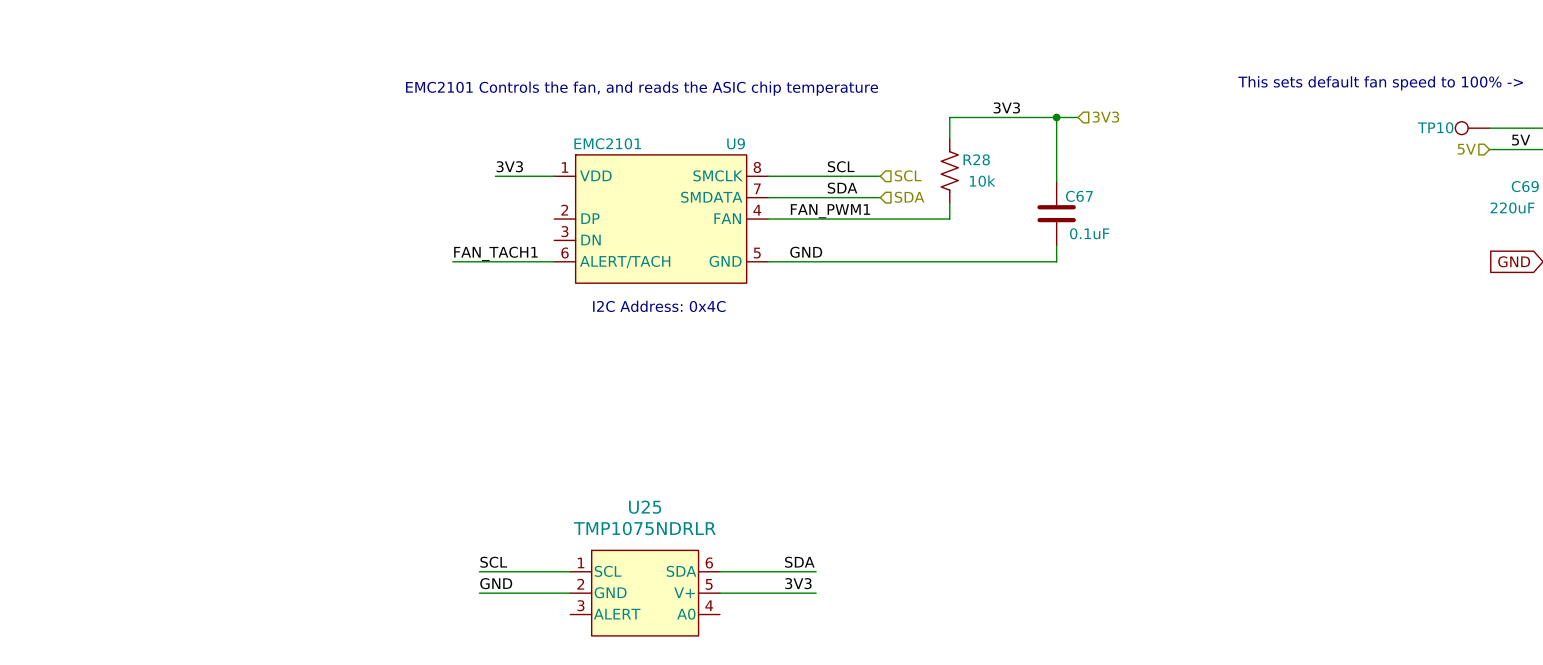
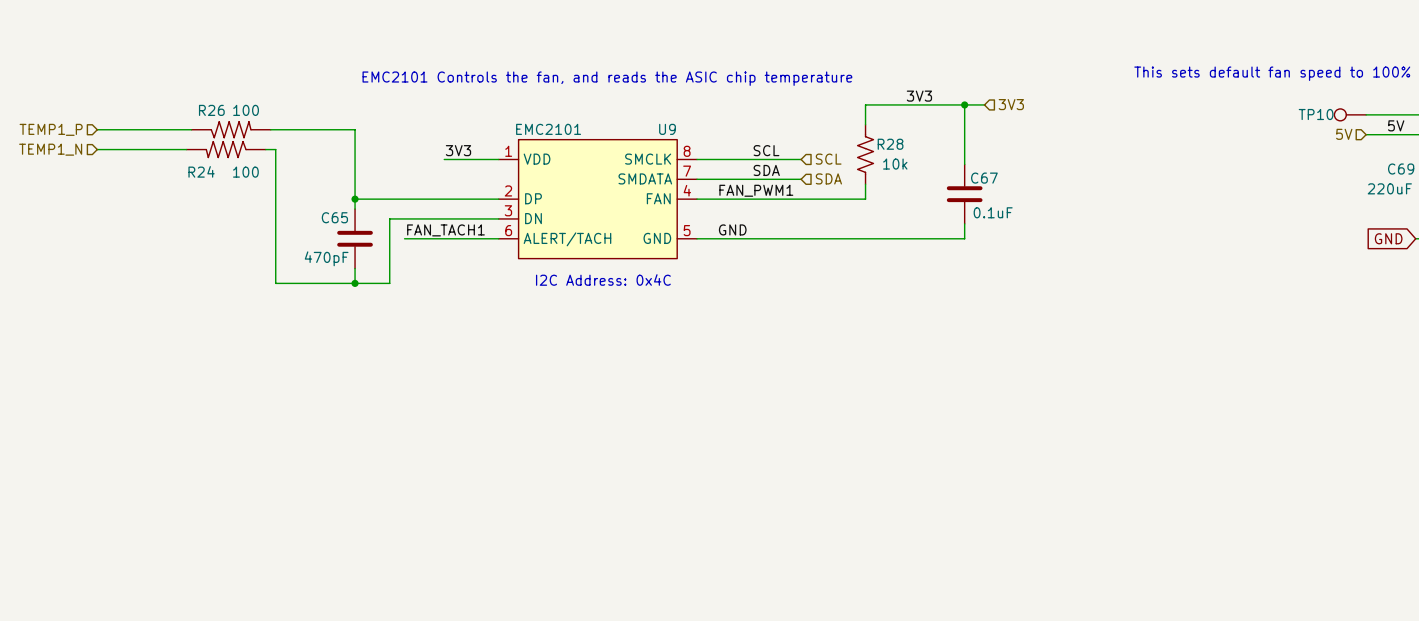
wire: none -> (97, 129) (191, 129)
R26: none -> 100 (231, 129)
wire: none -> (270, 129) (355, 129) (355, 209)
hierarchical label: none -> TEMP1_P (51, 129)
wire: none -> (97, 149) (186, 149)
R24: none -> 100 (226, 149)
wire: none -> (265, 149) (275, 149) (275, 283) (389, 283) (389, 218) (498, 218)
hierarchical label: none -> TEMP1_N (50, 149)
wire: none -> (355, 199) (498, 199)
junction: none -> (355, 199)
C65: none -> 470pF (355, 238)
wire: none -> (355, 268) (355, 283)
junction: none -> (355, 283)
label: SCL (493, 562) -> none
label: SDA (799, 562) -> none
wire: (479, 571) (570, 571) -> none
wire: (719, 571) (816, 571) -> none
label: GND (496, 583) -> none
label: 3V3 (798, 583) -> none
wire: (479, 593) (570, 593) -> none
U25: TMP1075NDRLR (645, 593) -> none
wire: (719, 593) (816, 593) -> none

